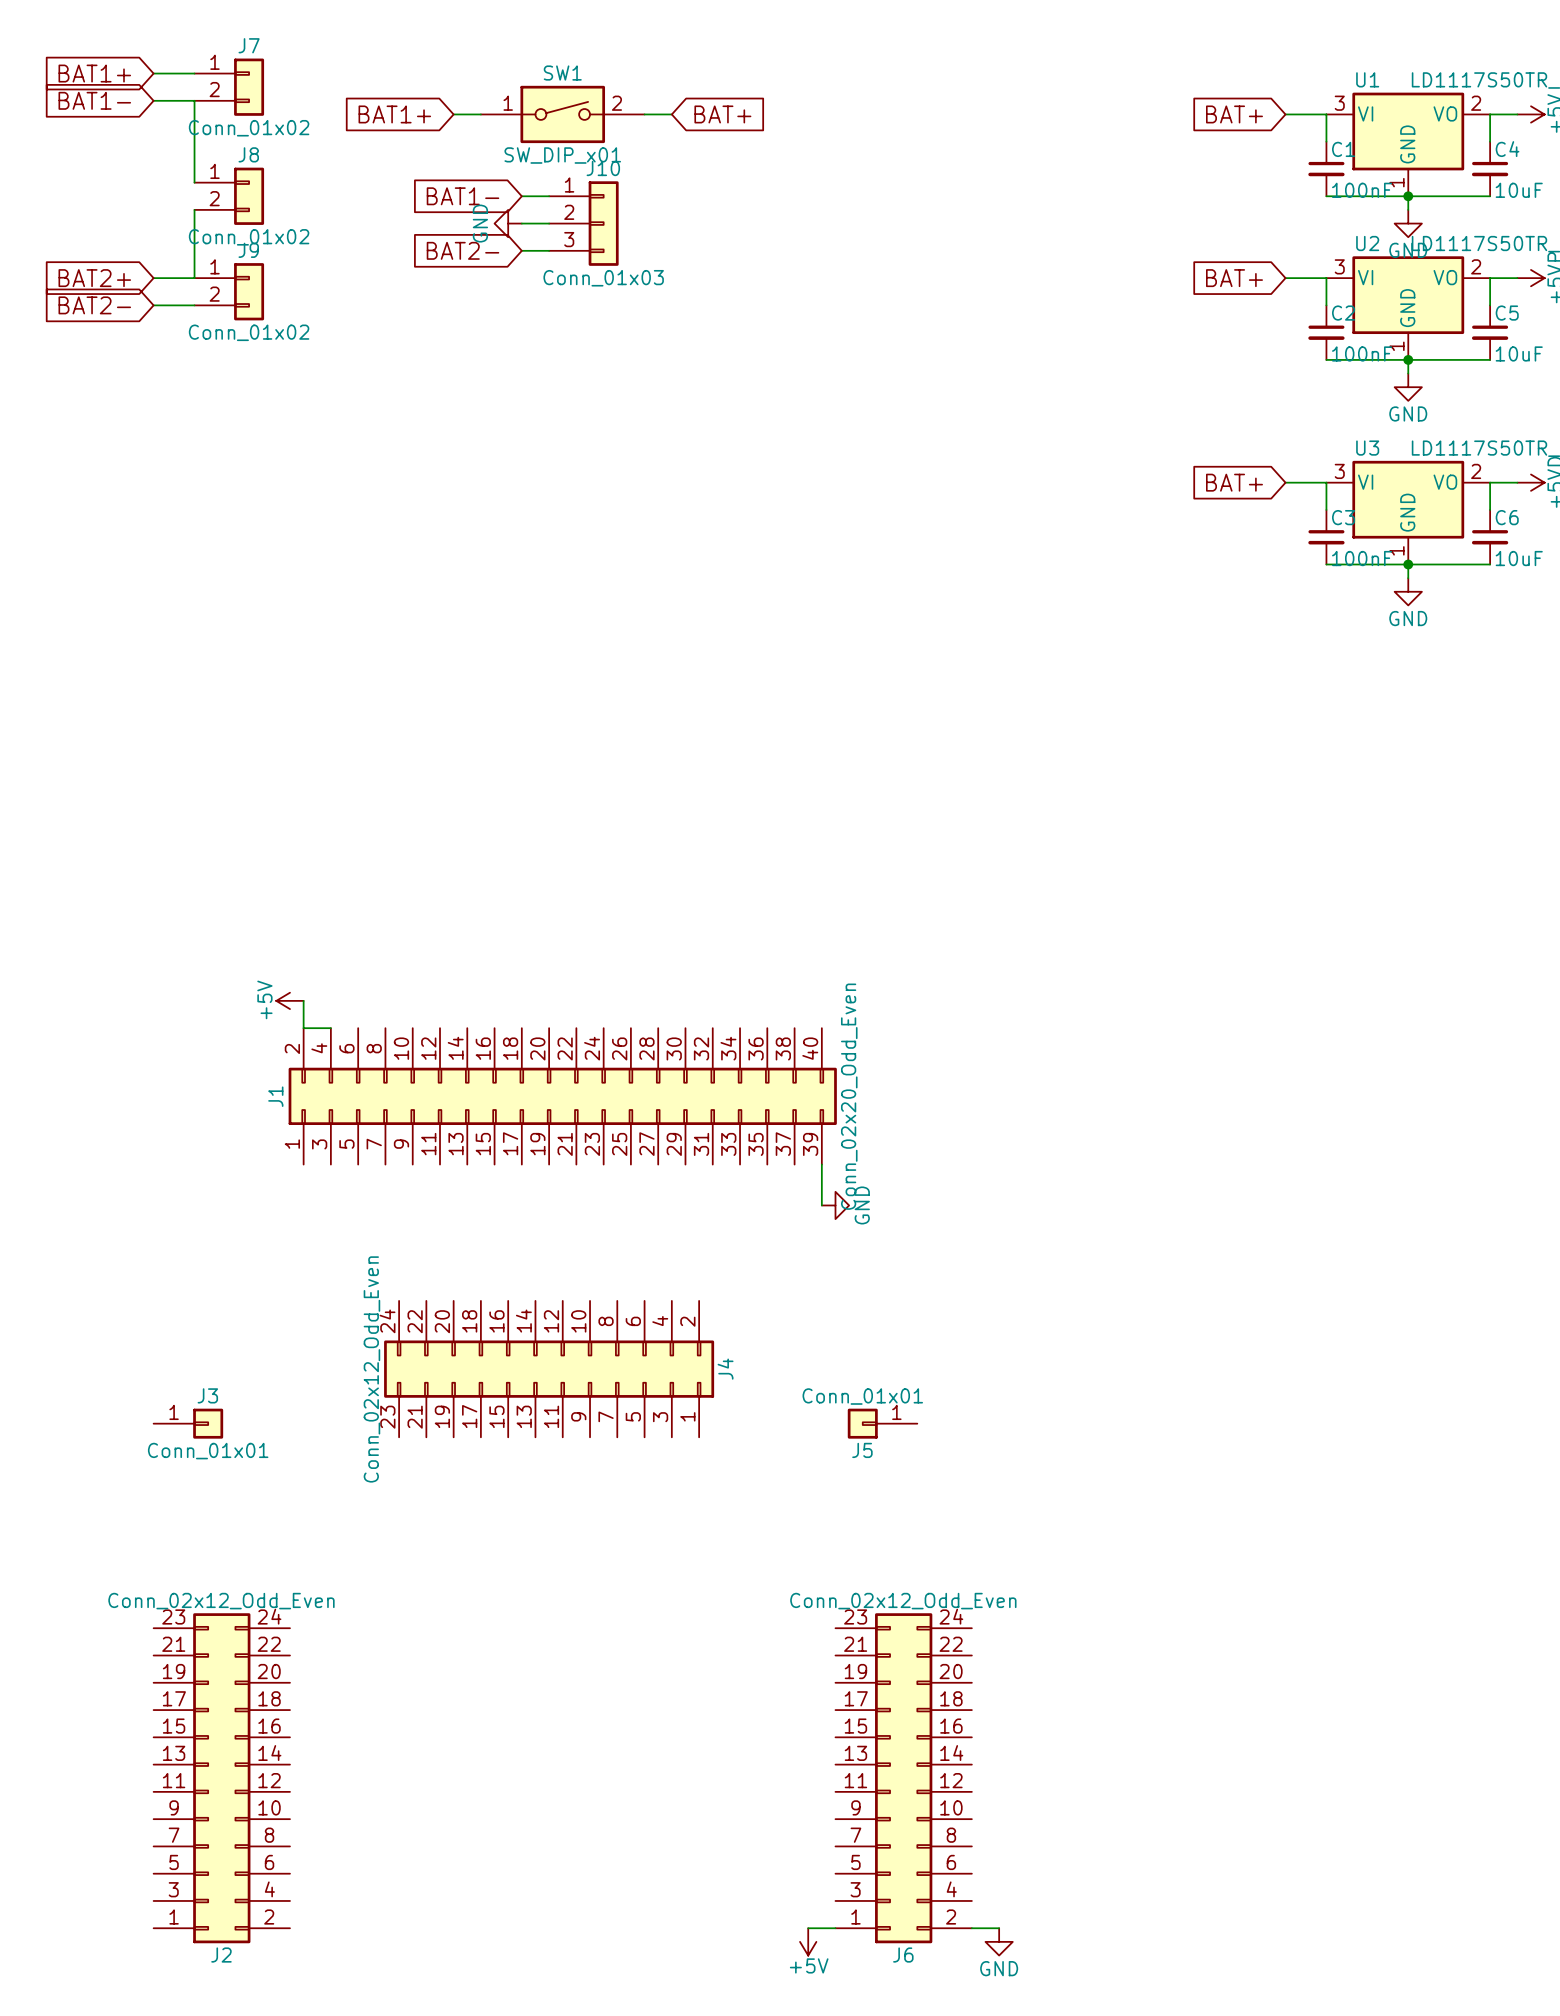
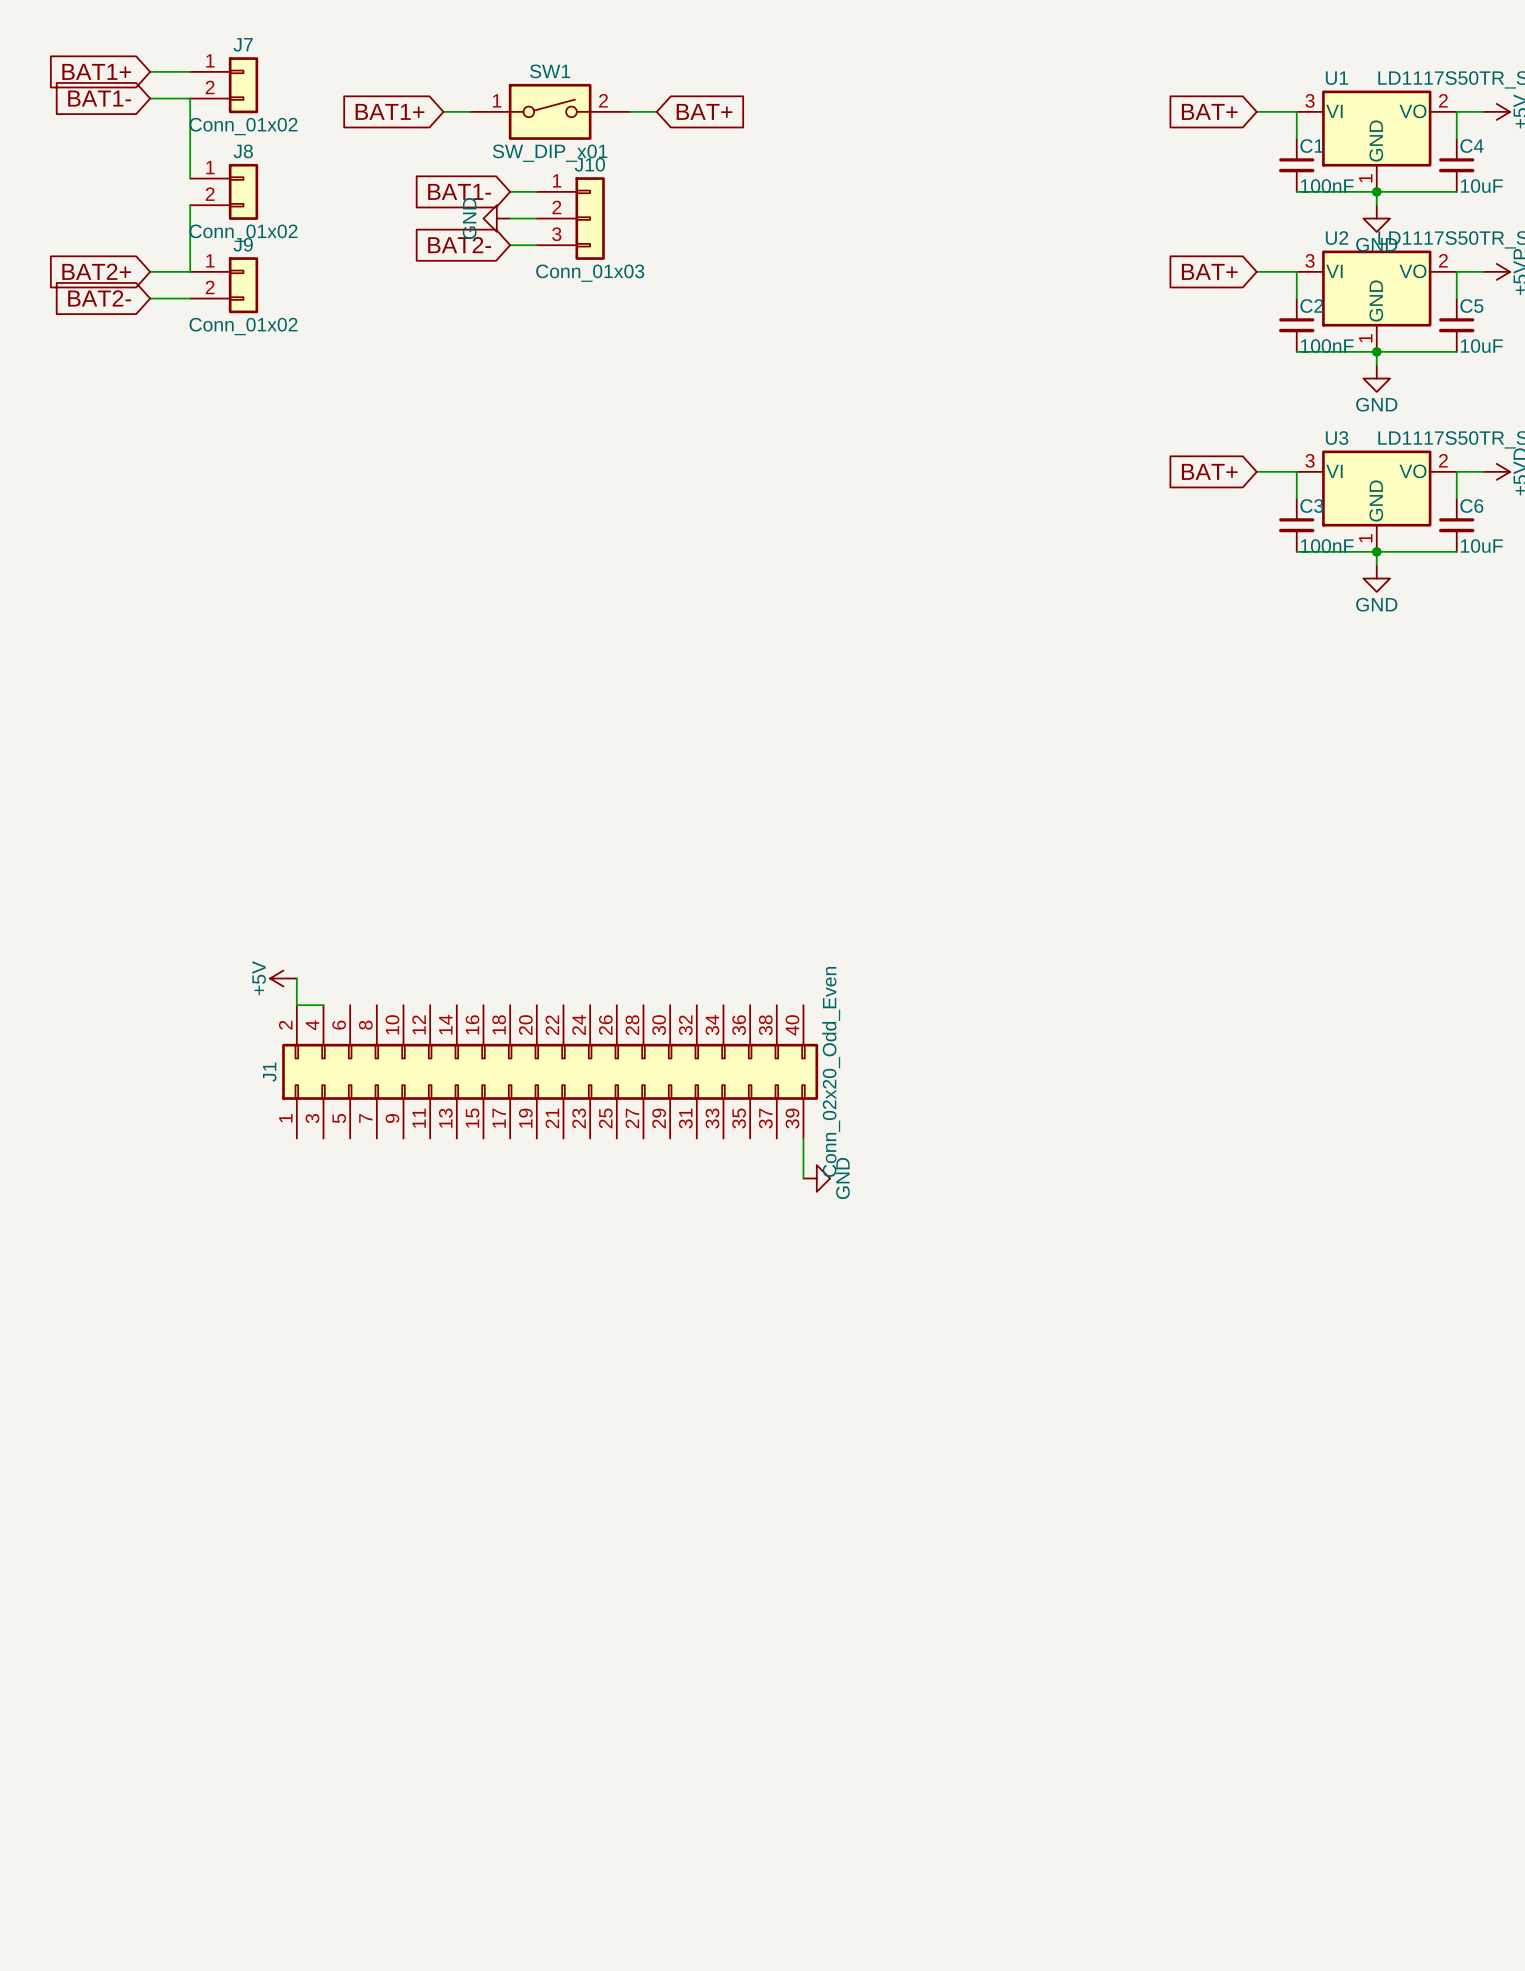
J4: Conn_02x12_Odd_Even (549, 1369) -> none
J3: Conn_01x01 (188, 1423) -> none
J5: Conn_01x01 (882, 1423) -> none
J2: Conn_02x12_Odd_Even (221, 1778) -> none
J6: Conn_02x12_Odd_Even (903, 1778) -> none
wire: (808, 1928) (835, 1928) -> none
wire: (971, 1928) (999, 1928) -> none
power symbol: +5V (808, 1941) -> none
power symbol: GND (999, 1941) -> none

